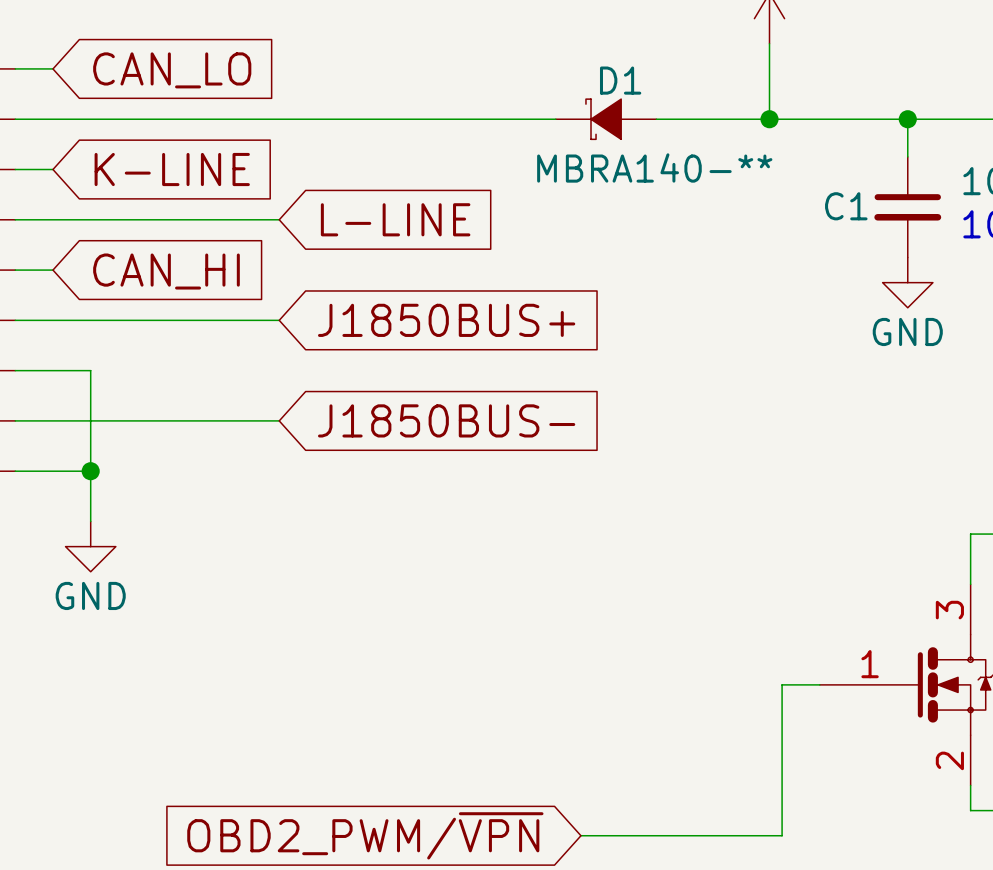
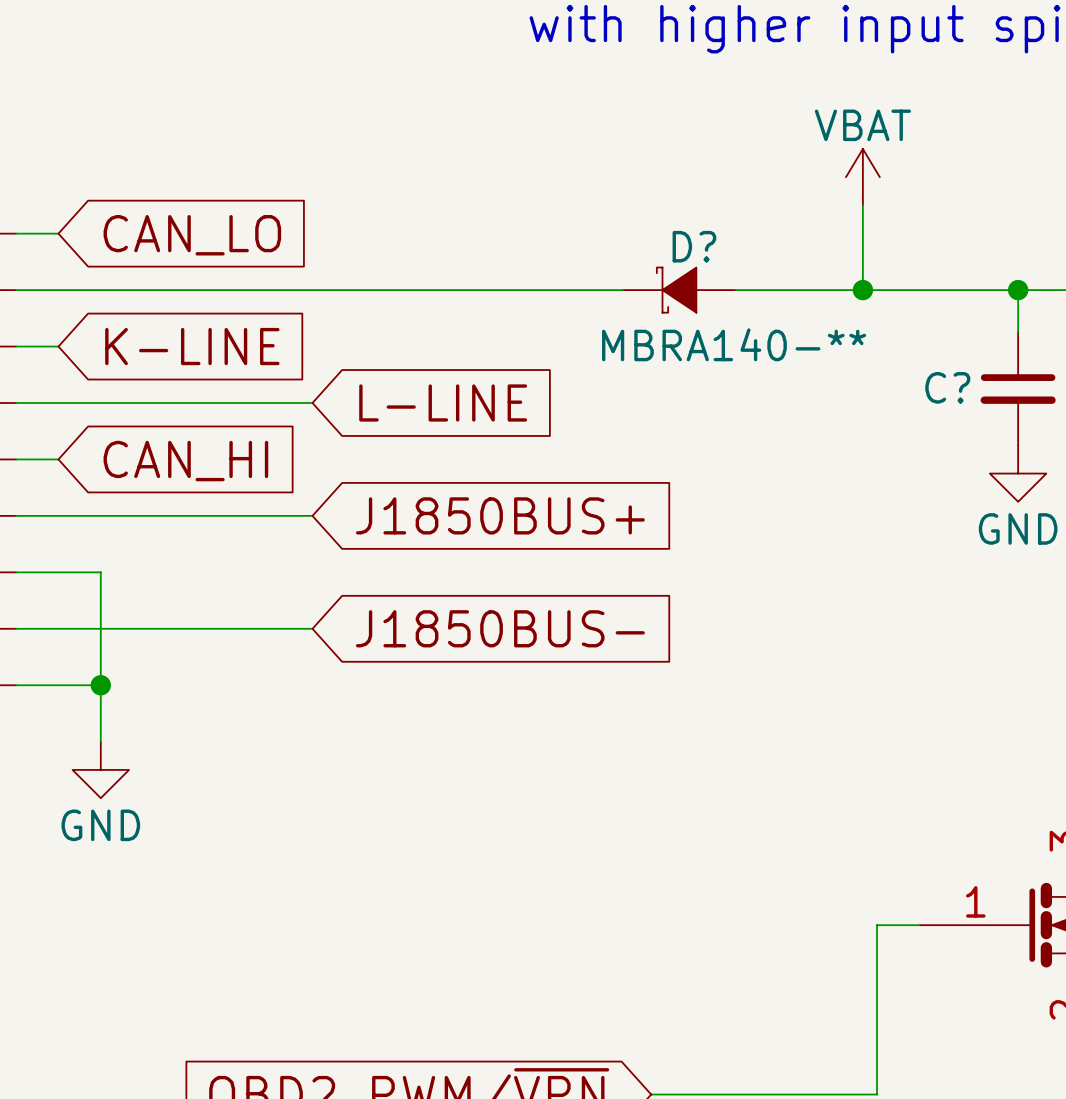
D1 name: D1 (620, 80) -> D? (694, 246)
C1 name: C1 (846, 206) -> C? (947, 387)

